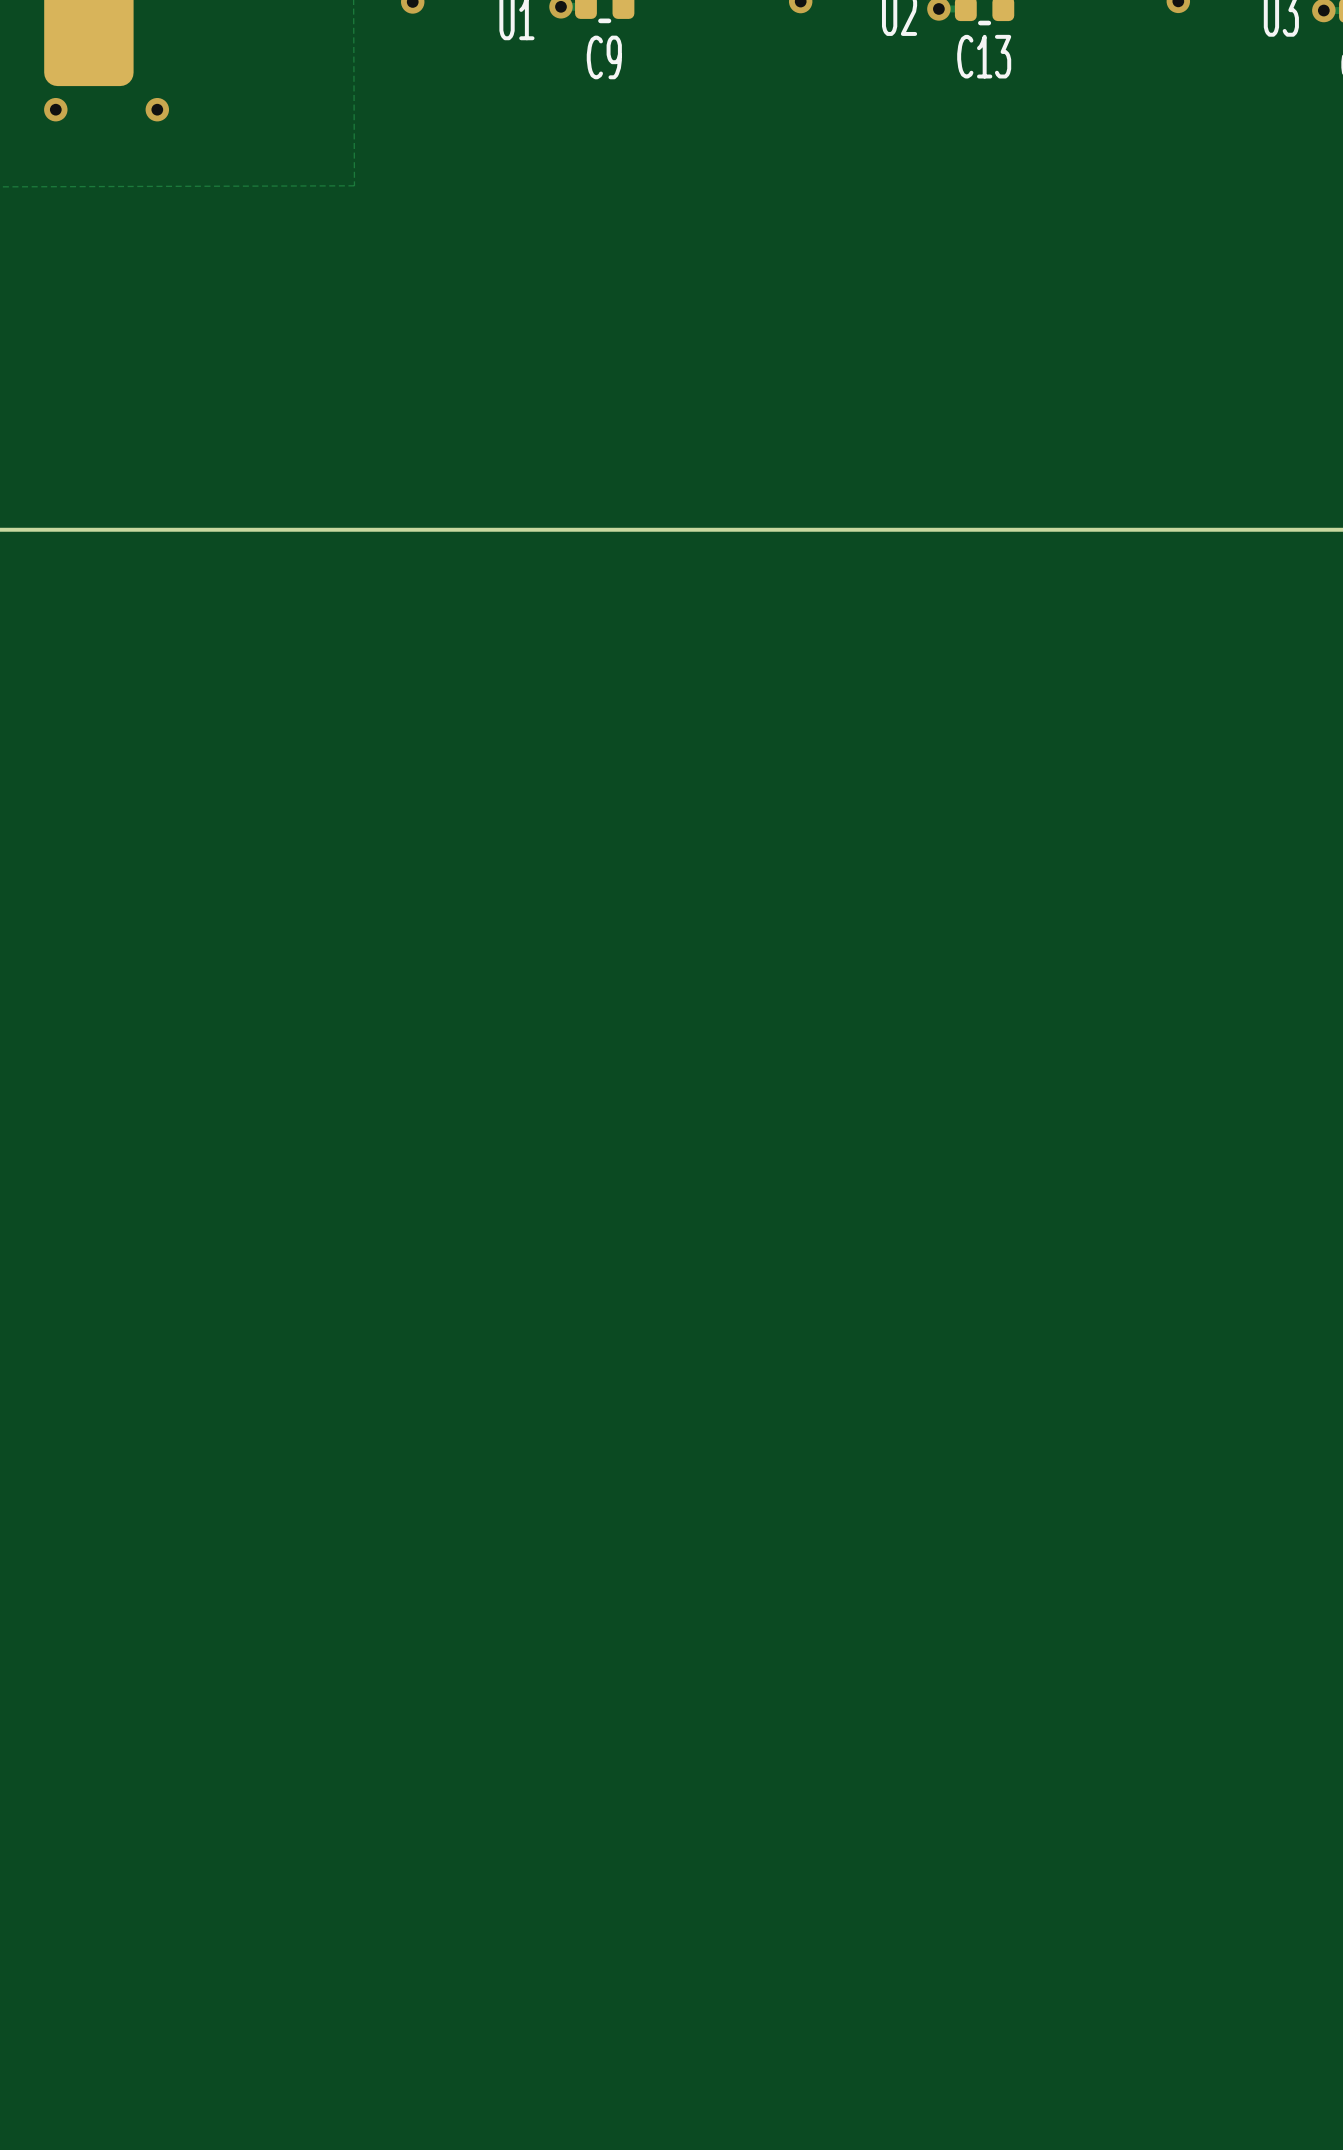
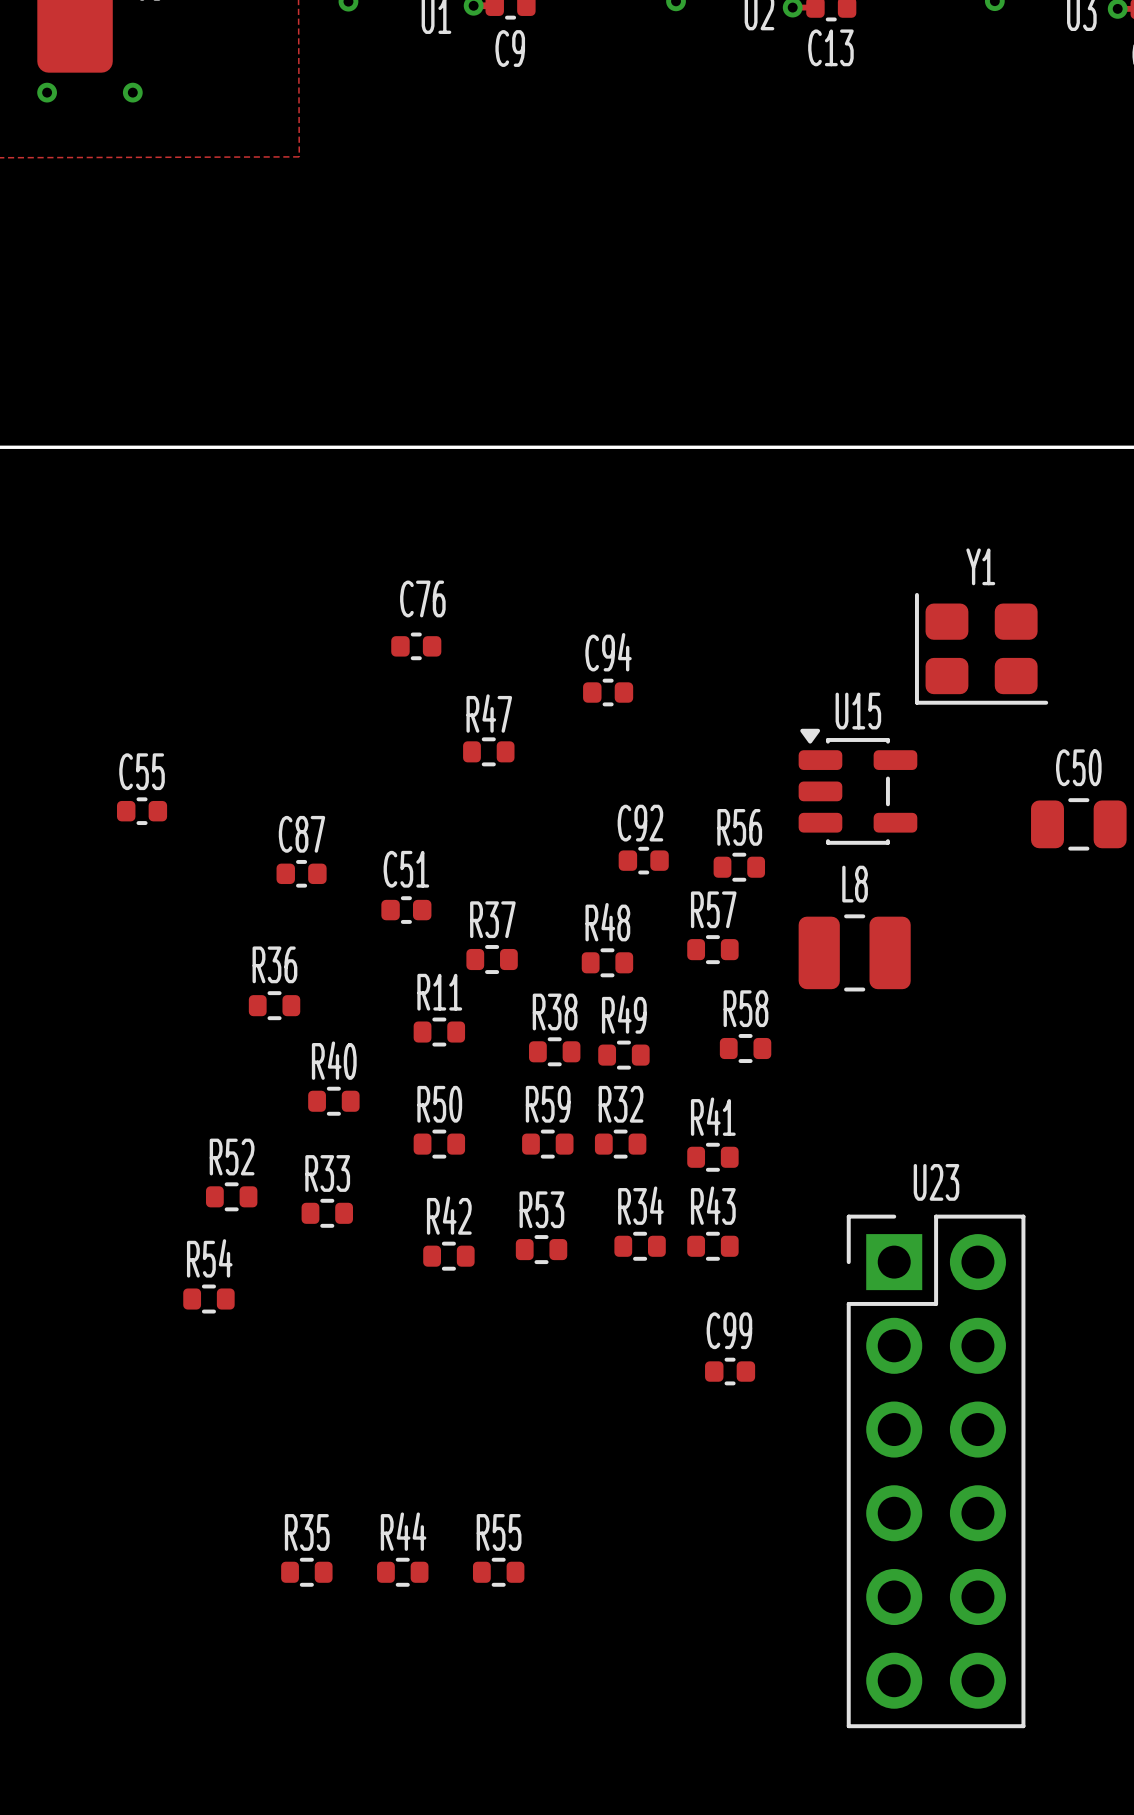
C76: none -> (416, 646)
Y1: none -> (981, 648)
C94: none -> (608, 692)
R47: none -> (488, 751)
U15: none -> (857, 786)
C55: none -> (142, 811)
C50: none -> (1078, 824)
C92: none -> (643, 860)
R56: none -> (739, 867)
C87: none -> (301, 873)
C51: none -> (406, 910)
R57: none -> (712, 949)
L8: none -> (854, 952)
R37: none -> (492, 959)
R48: none -> (607, 962)
R36: none -> (274, 1005)
R11: none -> (439, 1032)
R58: none -> (745, 1048)
R38: none -> (554, 1051)
R49: none -> (623, 1055)
R40: none -> (333, 1101)
R50: none -> (439, 1144)
R59: none -> (547, 1144)
R32: none -> (620, 1144)
R41: none -> (712, 1157)
R52: none -> (231, 1196)
R33: none -> (327, 1213)
R34: none -> (640, 1246)
R43: none -> (712, 1246)
R53: none -> (541, 1249)
R42: none -> (448, 1256)
R54: none -> (208, 1299)
C99: none -> (730, 1371)
U23: none -> (936, 1471)
R35: none -> (306, 1572)
R44: none -> (402, 1572)
R55: none -> (498, 1572)

